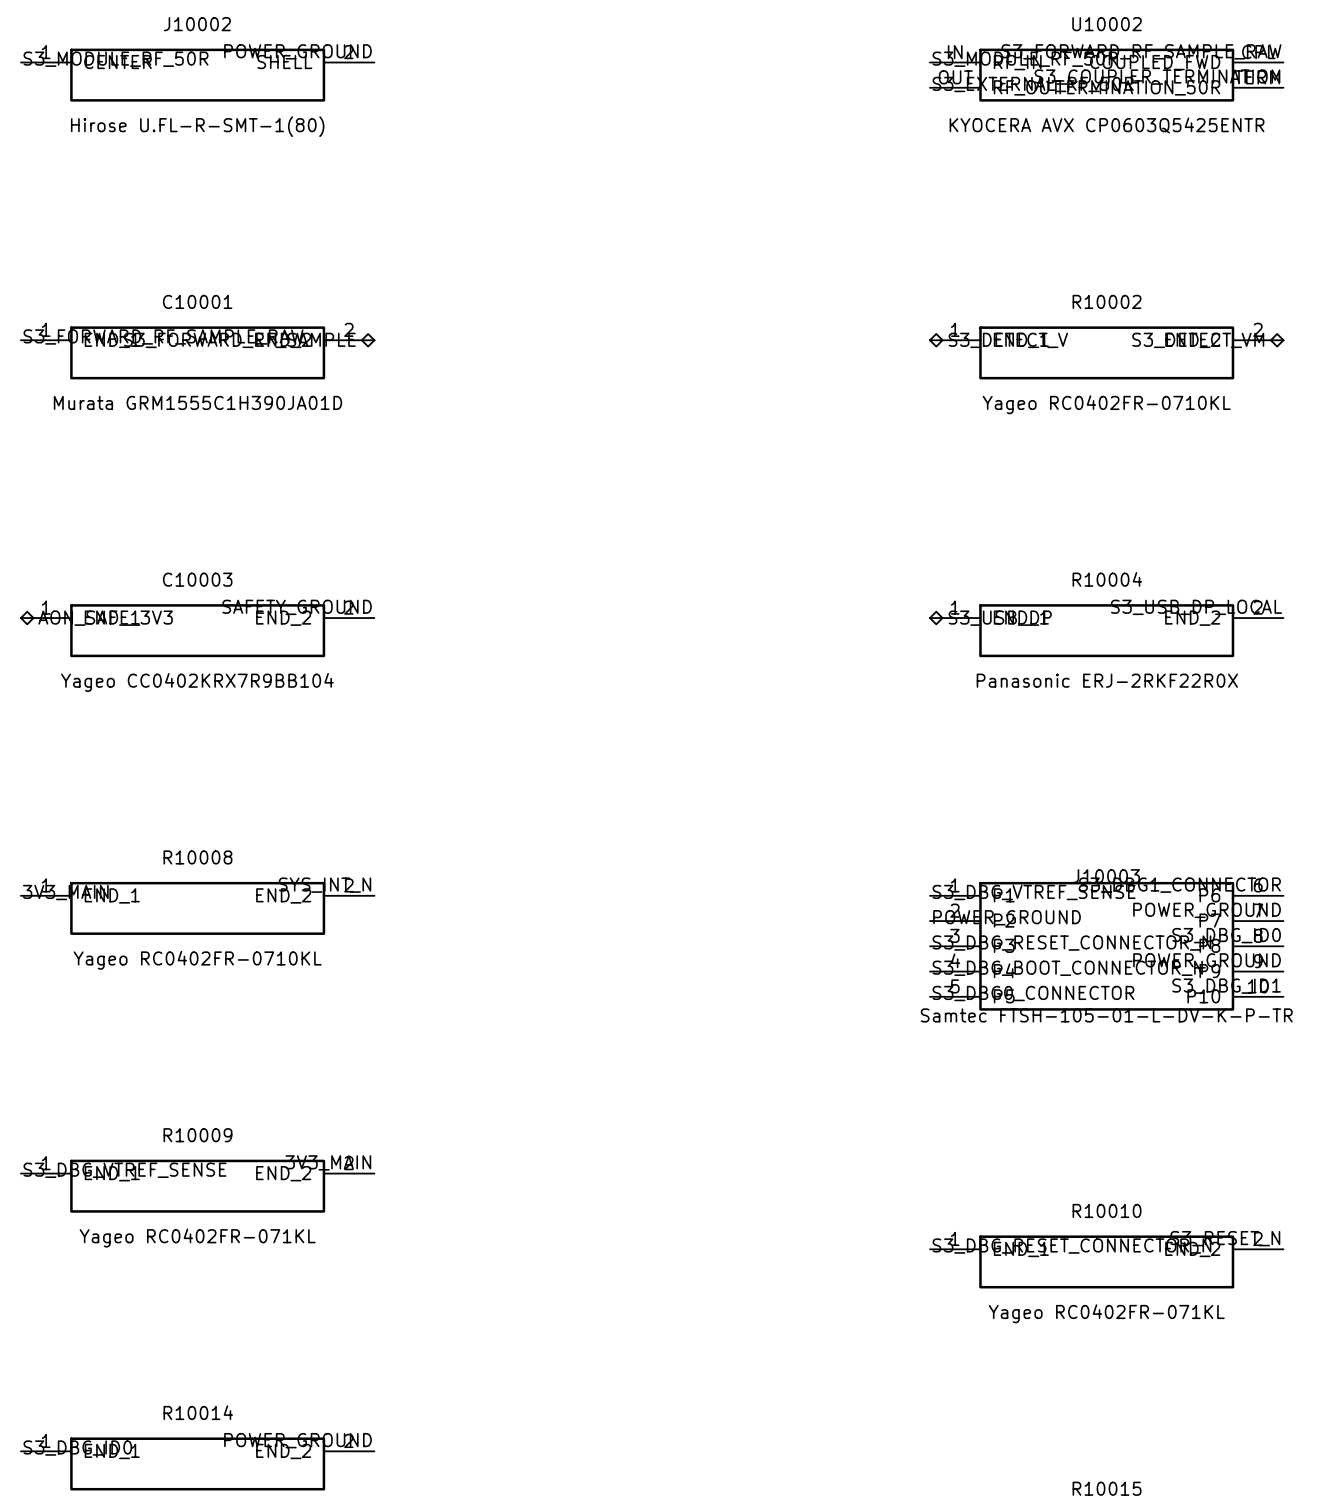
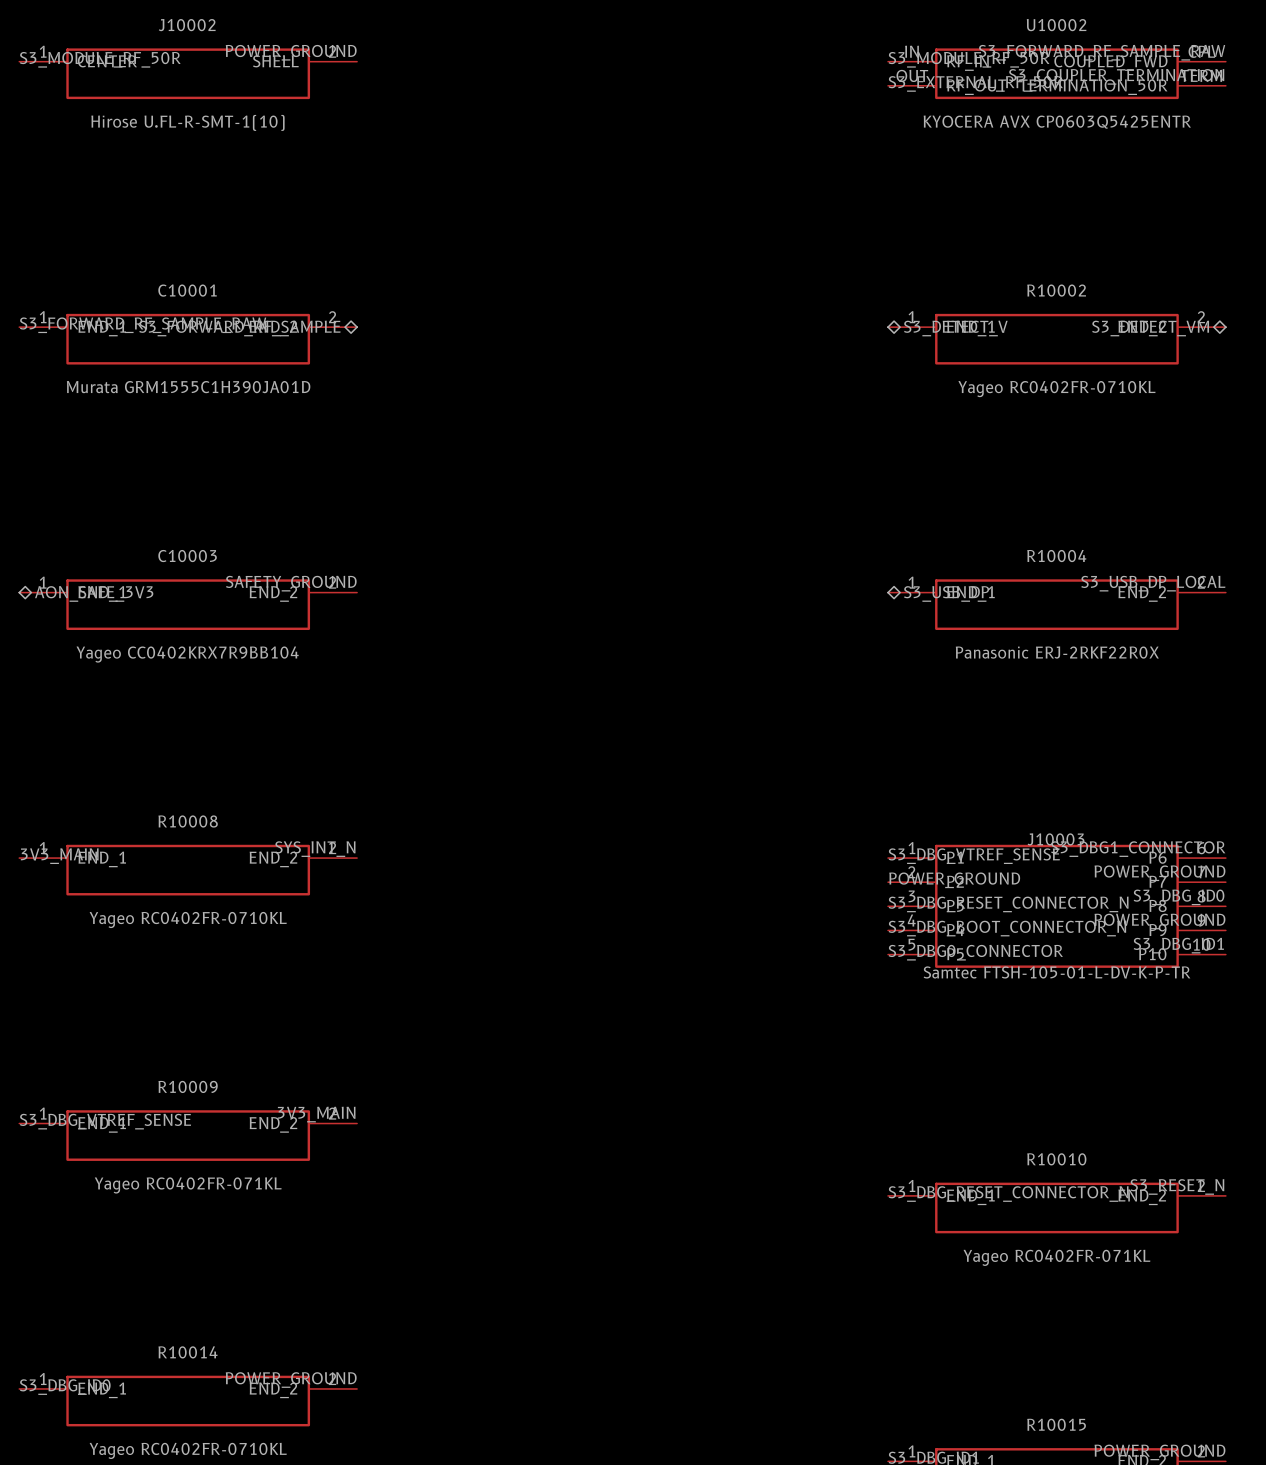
J10002 value: Hirose U.FL-R-SMT-1(80) (197, 126) -> Hirose U.FL-R-SMT-1(10) (187, 122)

